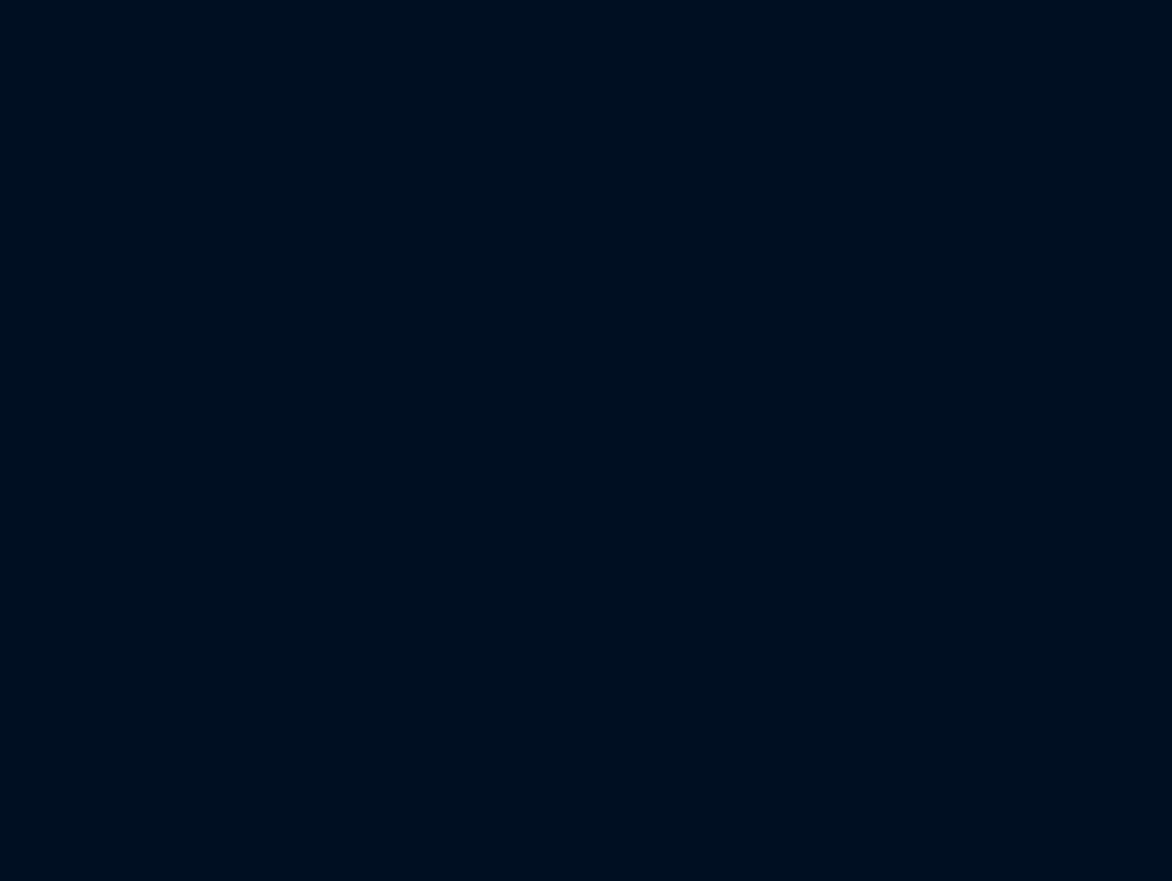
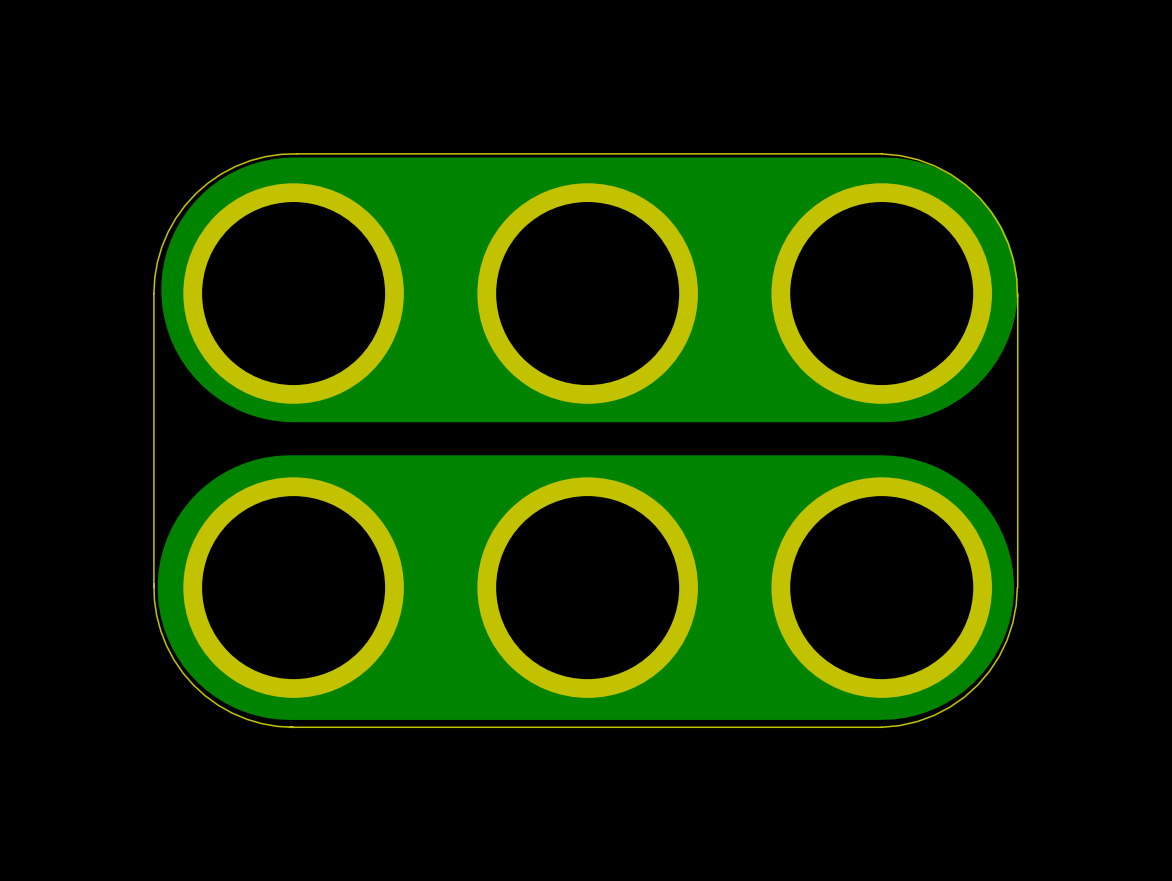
part: none -> (585, 440)

